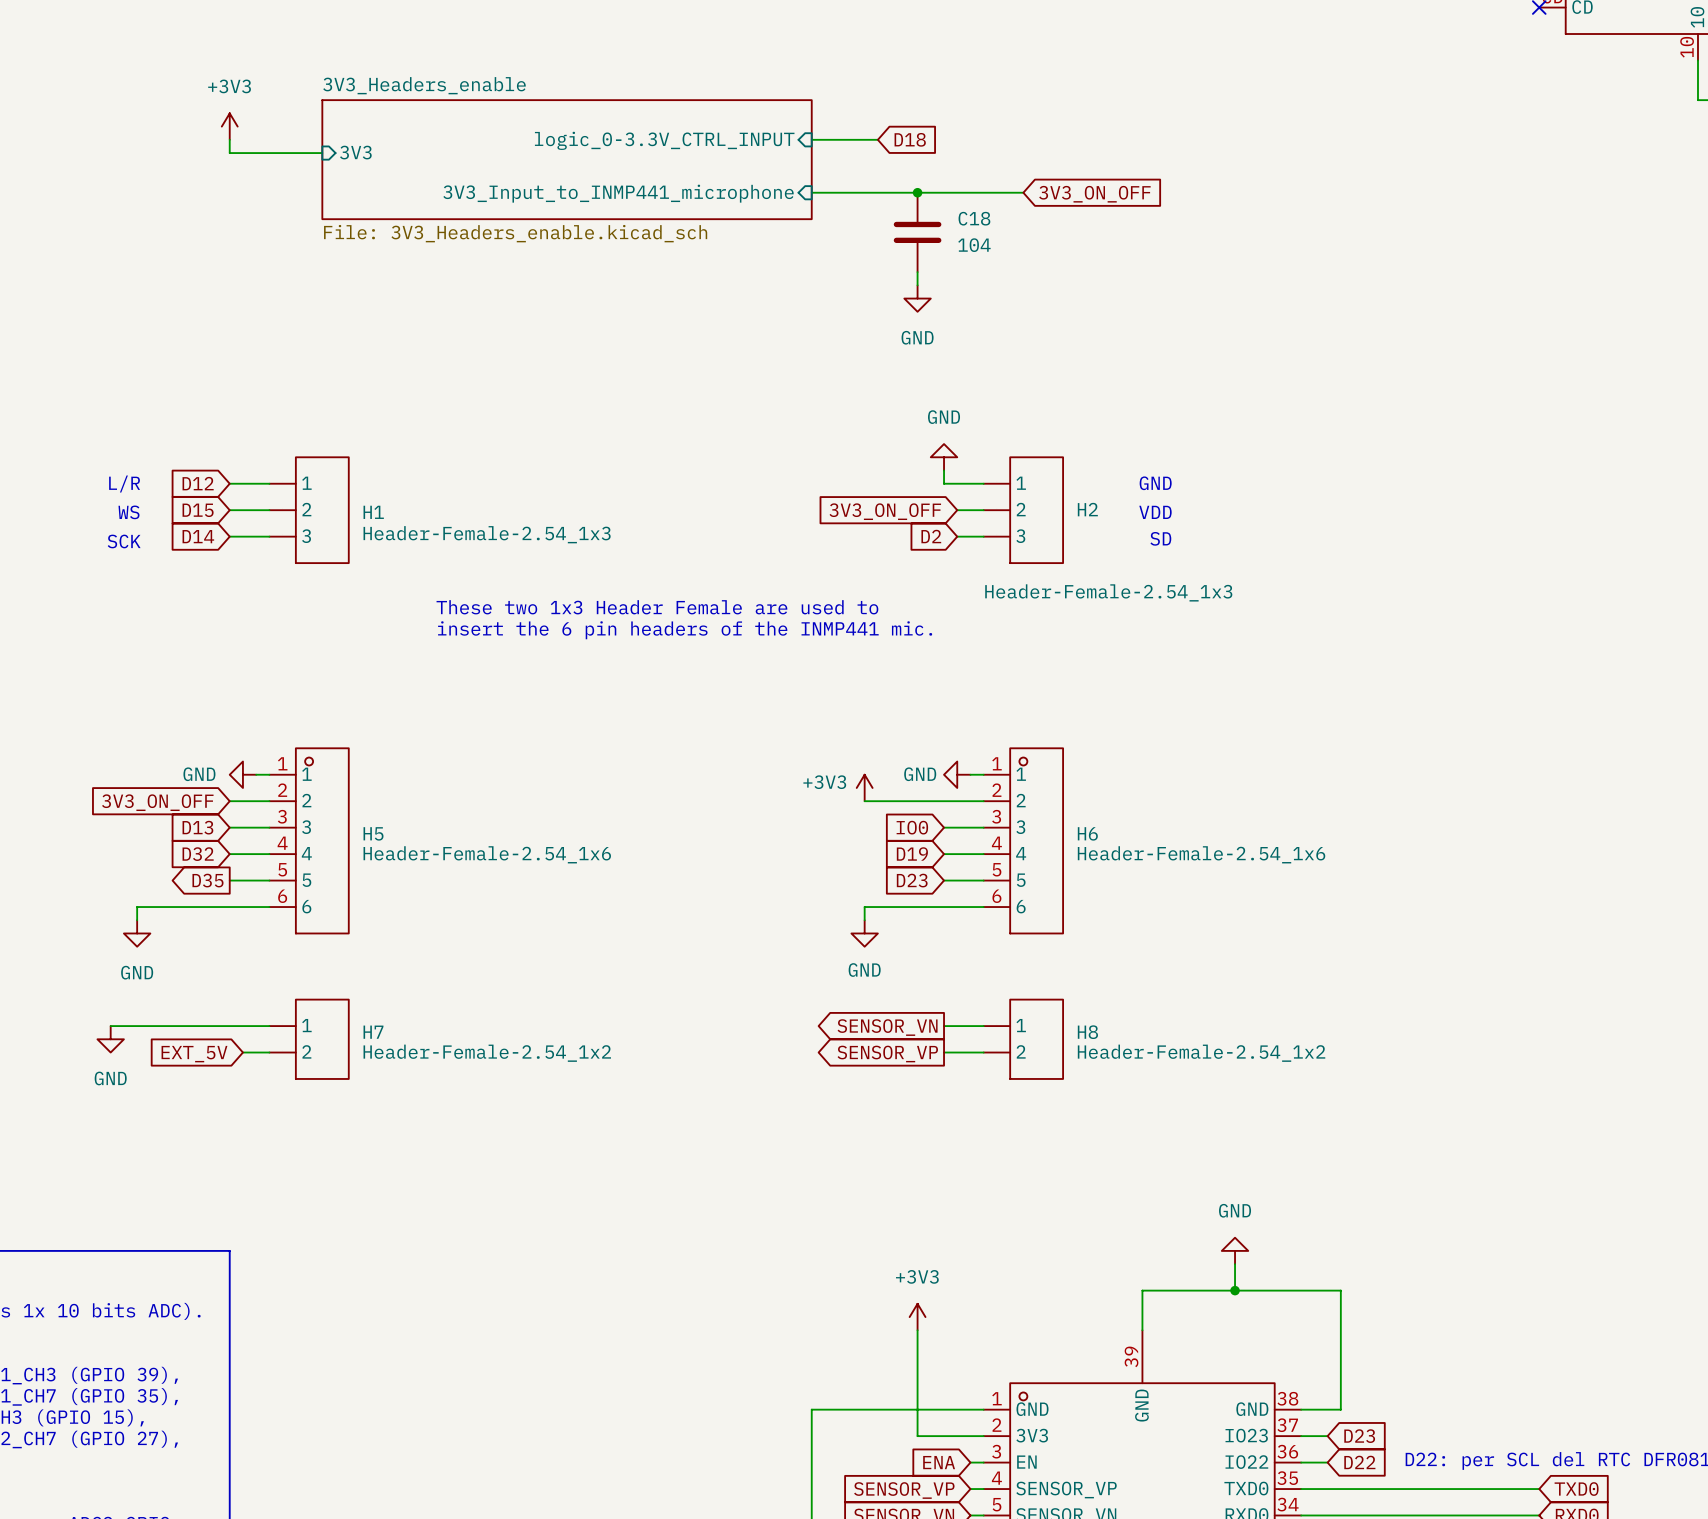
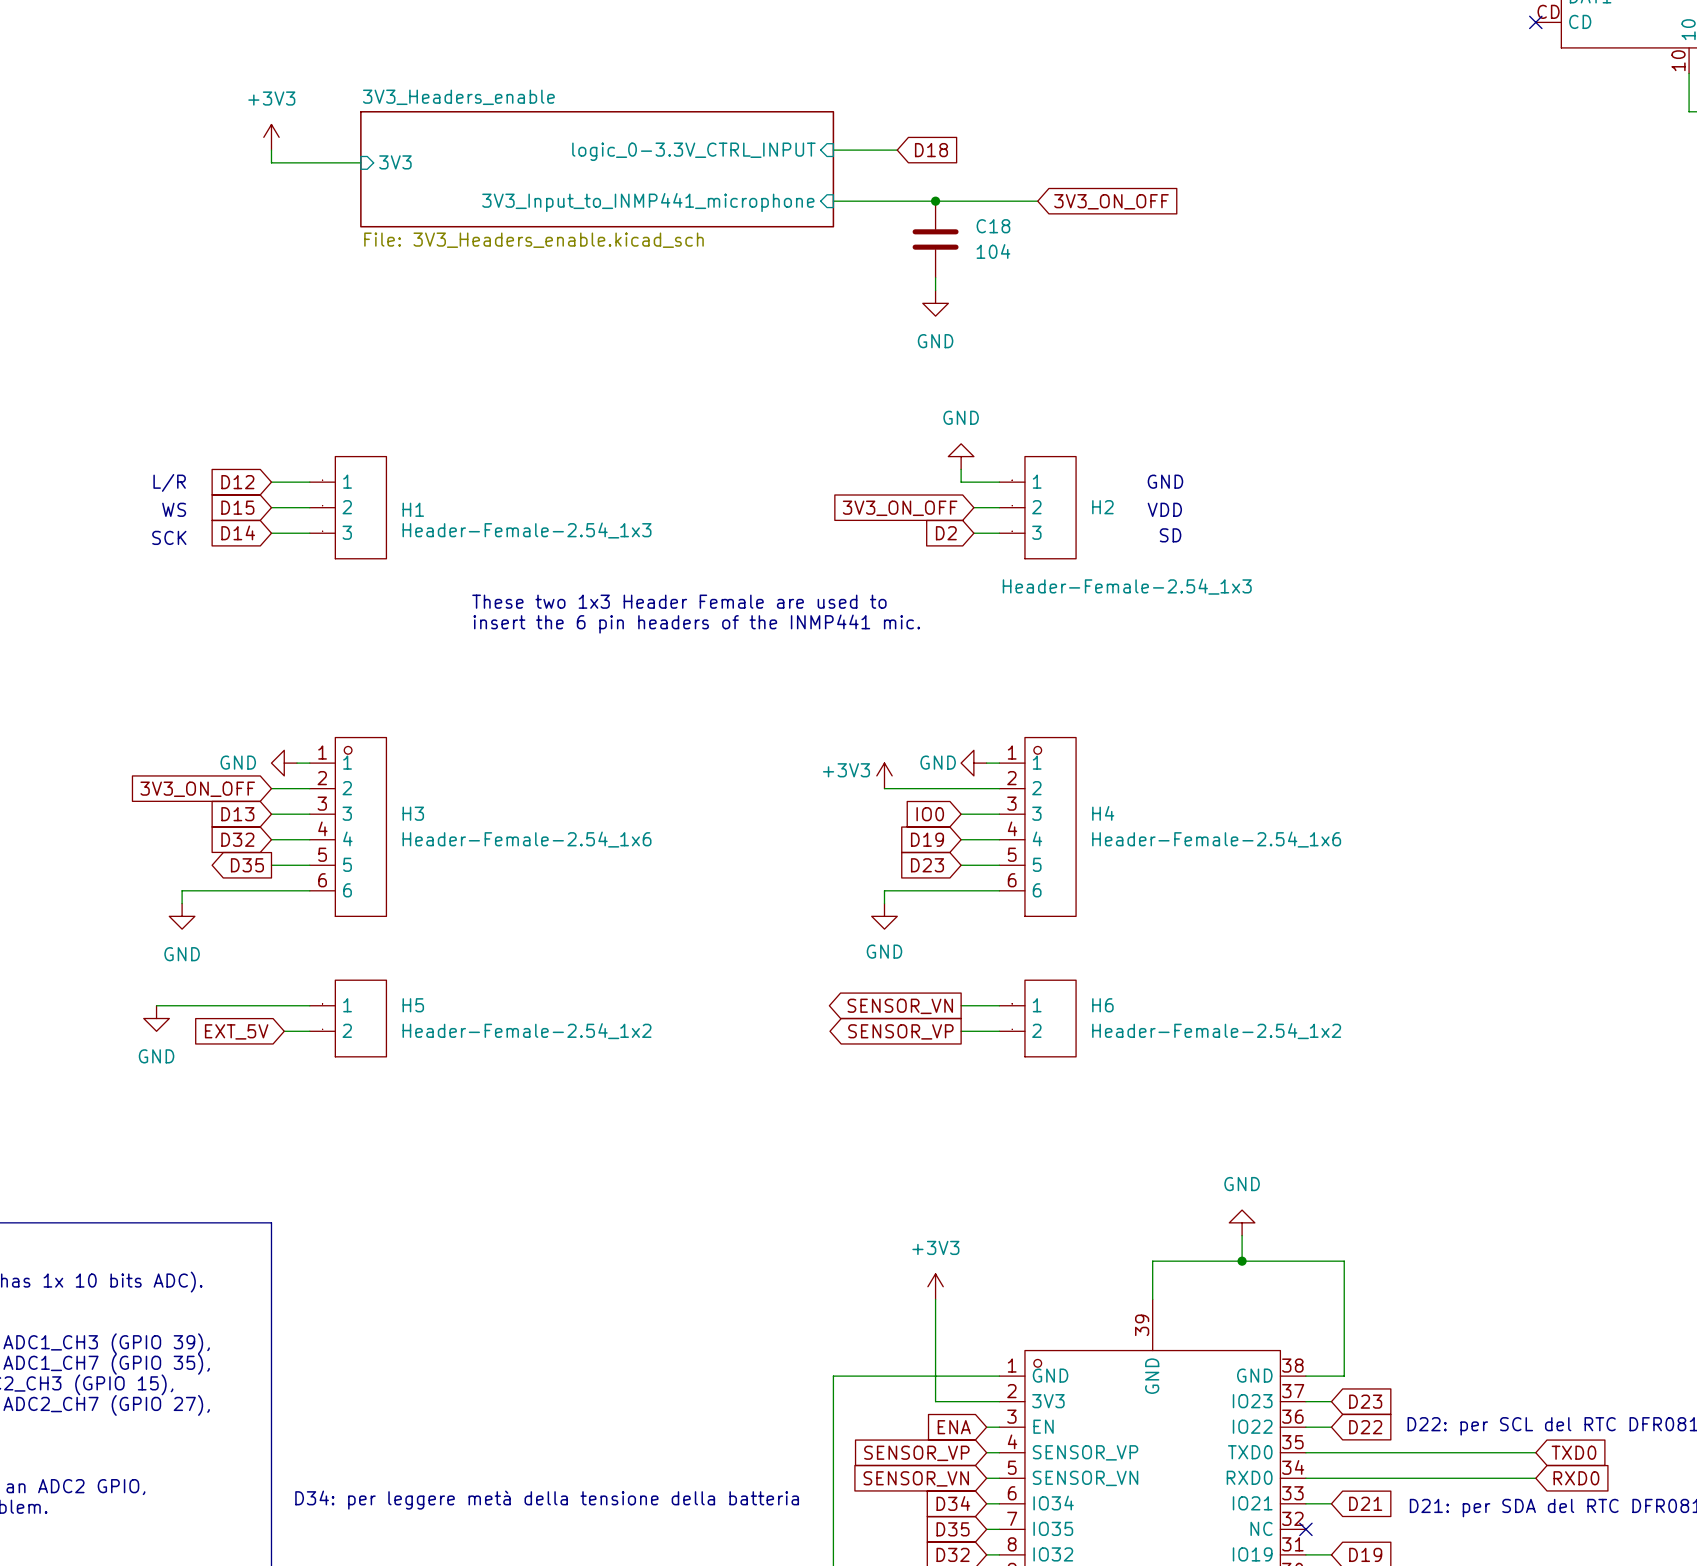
H5 name: H5 (373, 833) -> H3 (413, 813)
H6 name: H6 (1087, 833) -> H4 (1103, 813)
H7 name: H7 (373, 1032) -> H5 (413, 1005)
H8 name: H8 (1087, 1032) -> H6 (1102, 1005)

